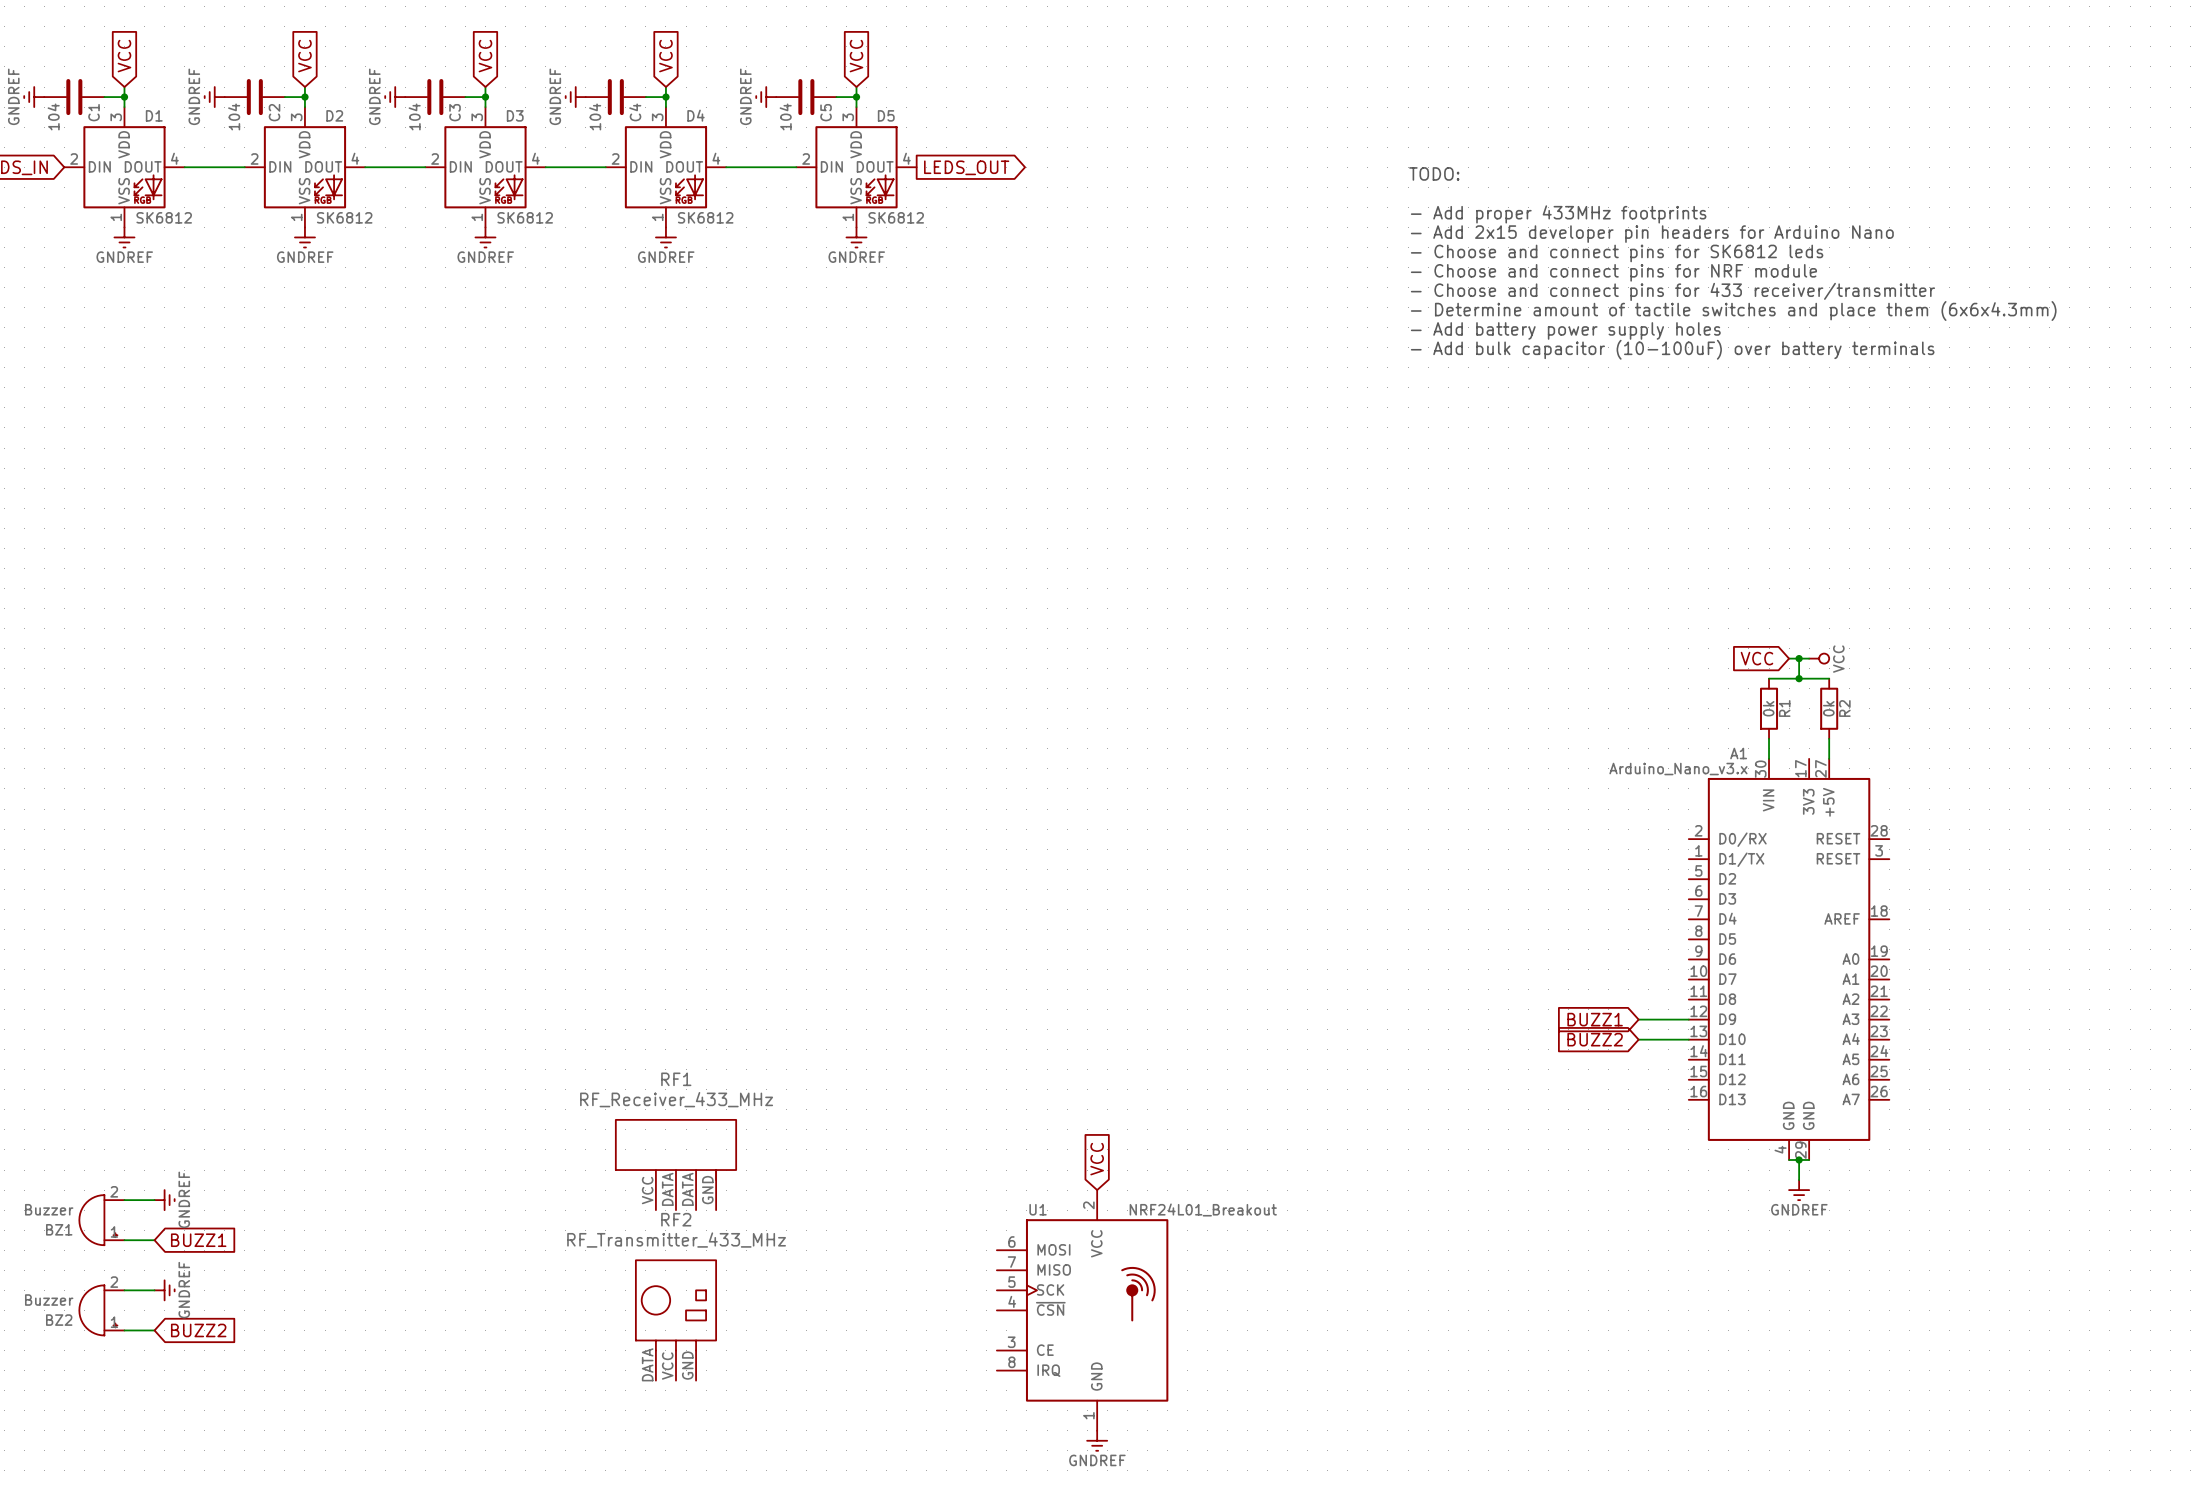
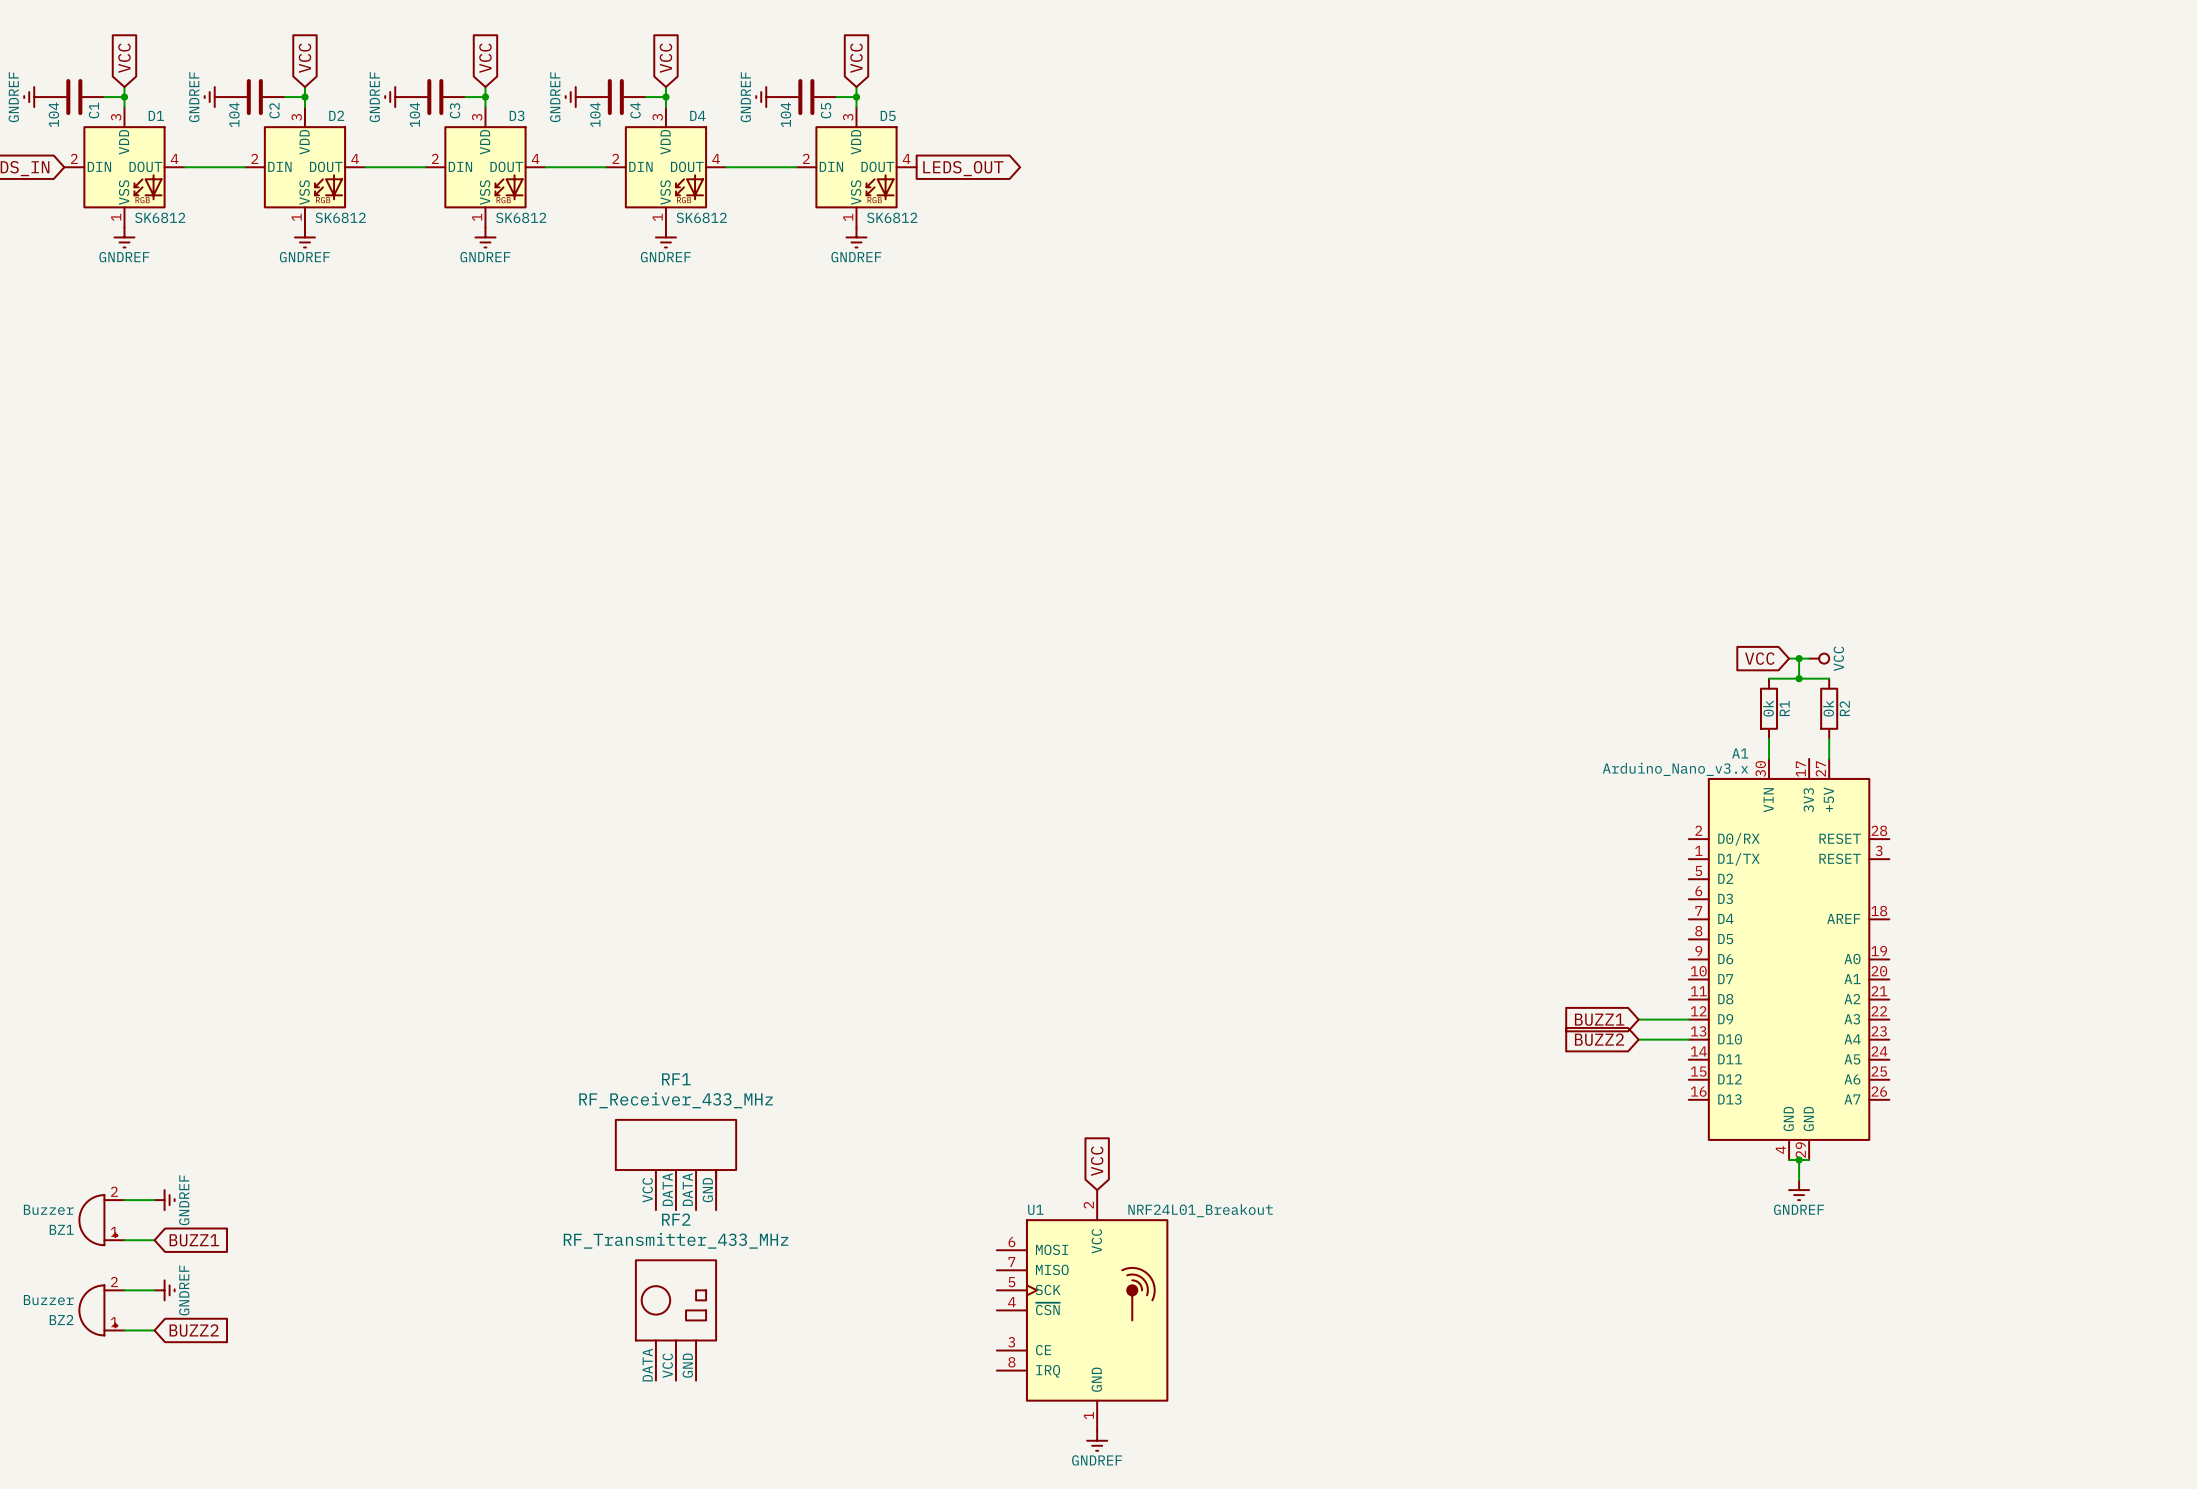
text: TODO: (1434, 173) -> none
text: - Add proper 433MHz footprints (1558, 214) -> none
text: - Add 2x15 developer pin headers for Arduino Nano (1652, 234) -> none
text: - Choose and connect pins for SK6812 leds (1617, 253) -> none
text: - Choose and connect pins for NRF module (1613, 272) -> none
text: - Choose and connect pins for 433 receiver/transmitter (1672, 291) -> none
text: - Determine amount of tactile switches and place them (6x6x4.3mm) (1733, 311) -> none
text: - Add battery power supply holes (1565, 330) -> none
text: - Add bulk capacitor (10-100uF) over battery terminals (1672, 349) -> none

